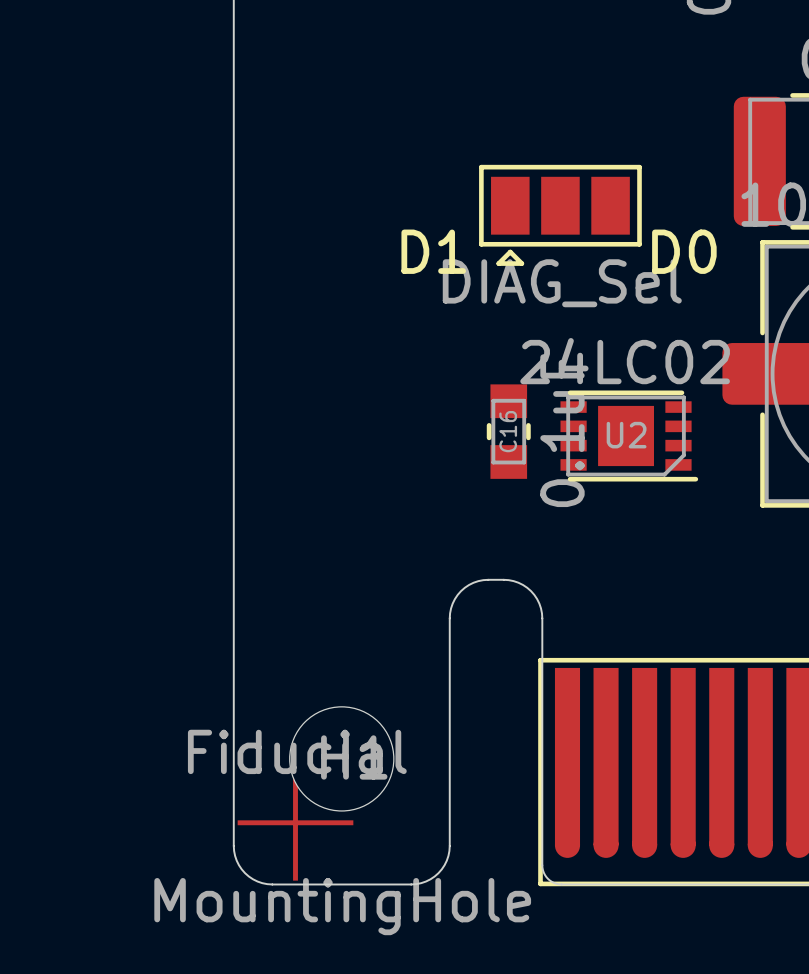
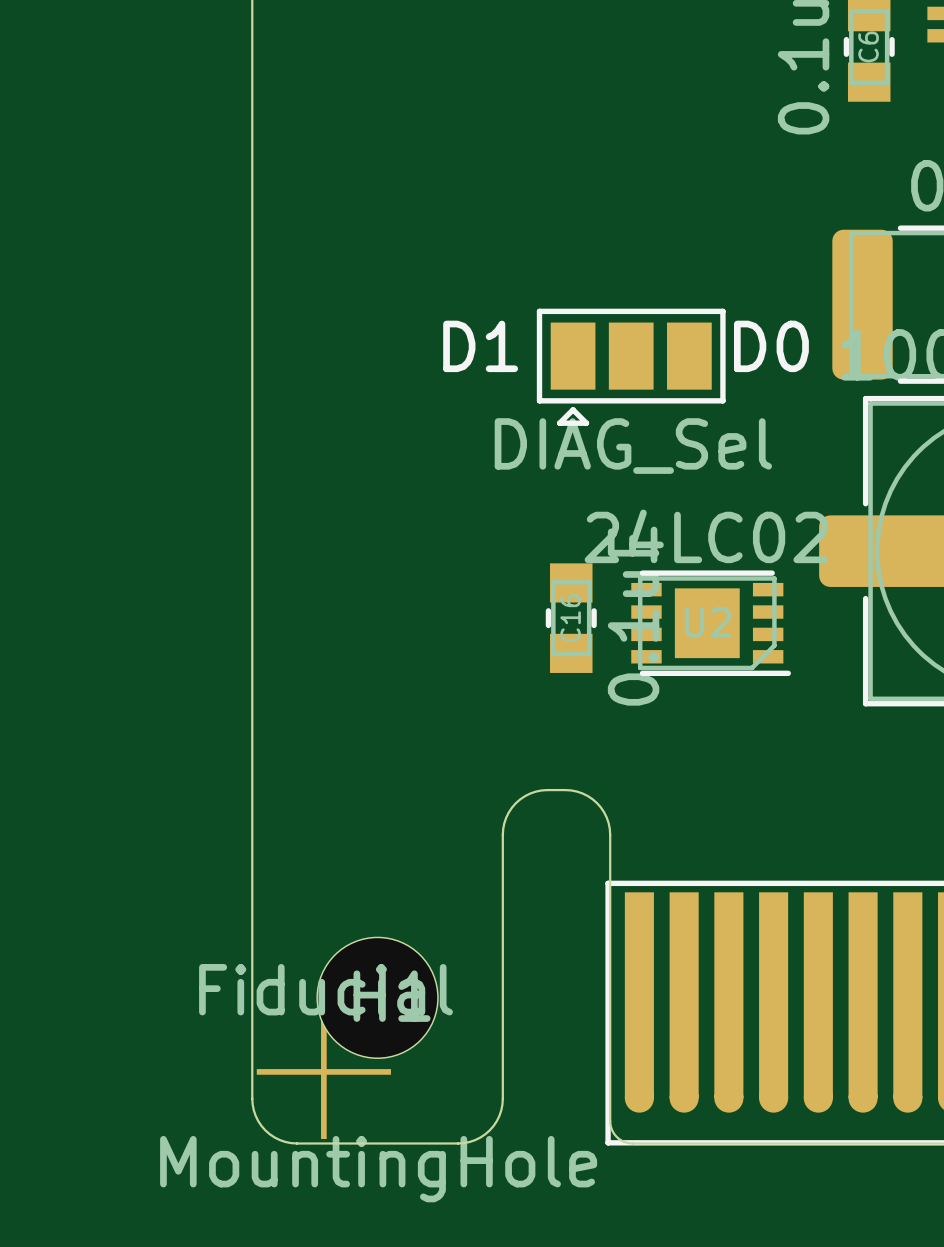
text position: D1 (433, 251) -> D1 (480, 346)
text position: D0 (684, 251) -> D0 (771, 346)

